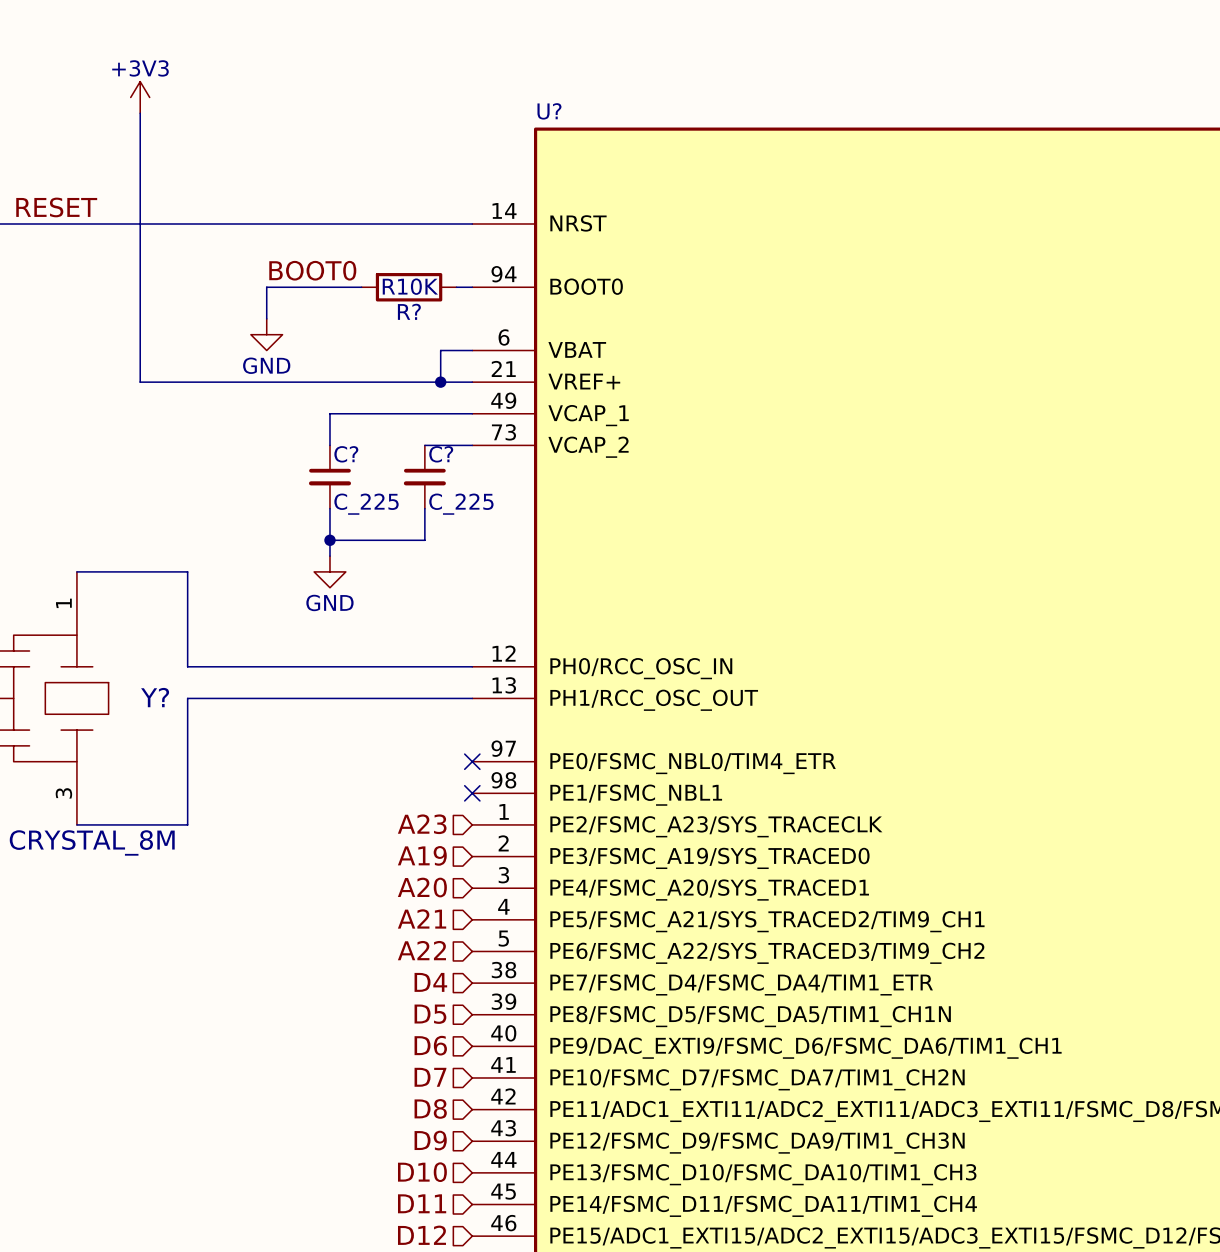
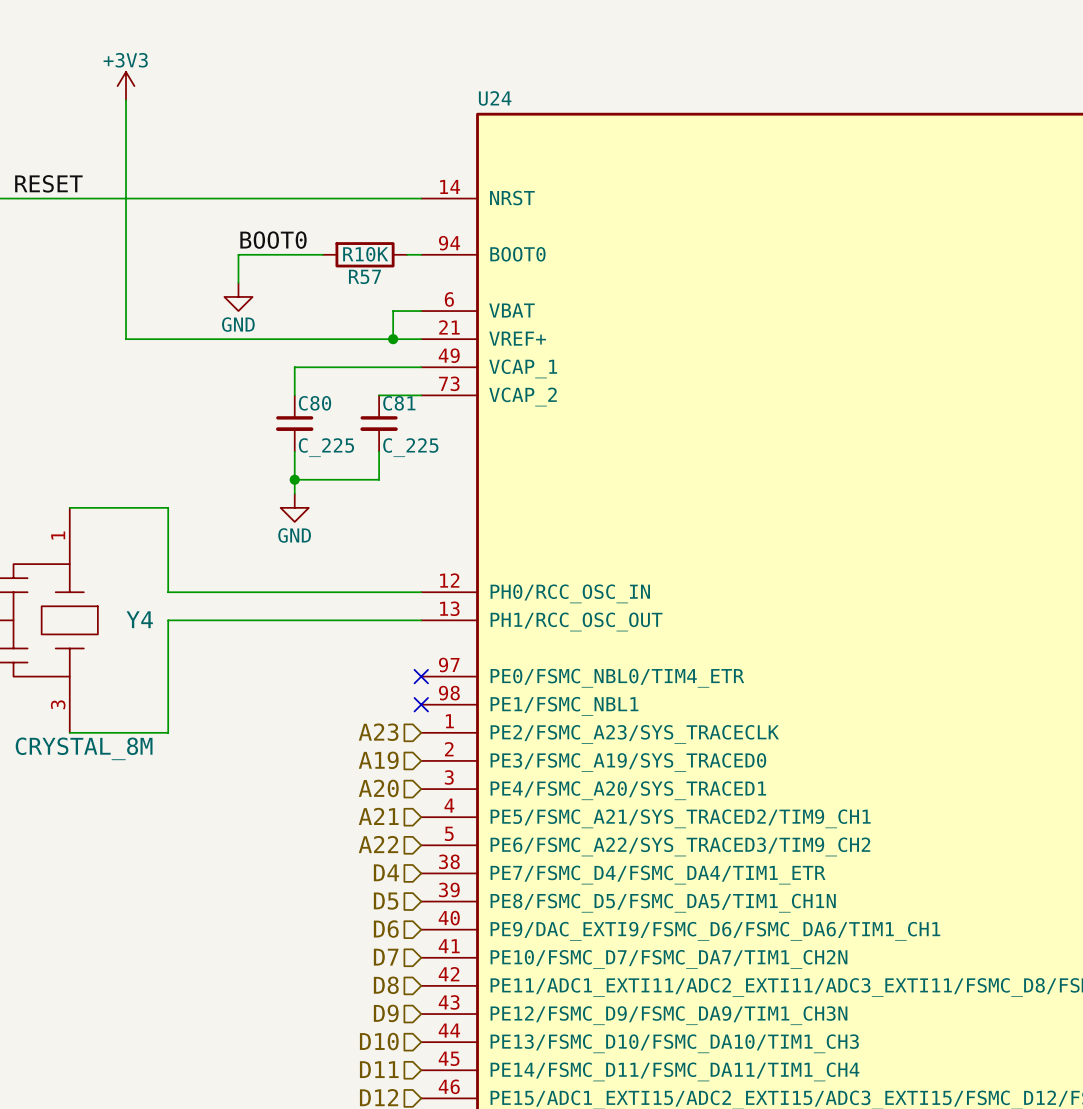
U? name: U? (549, 111) -> U24 (495, 98)
R? name: R? (409, 311) -> R57 (364, 276)
C? name: C? (346, 454) -> C80 (314, 403)
C? name: C? (441, 454) -> C81 (399, 403)
Y? name: Y? (155, 697) -> Y4 (139, 619)

